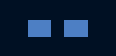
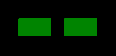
part footprint: [28, 20, 88, 37] -> [18, 18, 97, 36]

